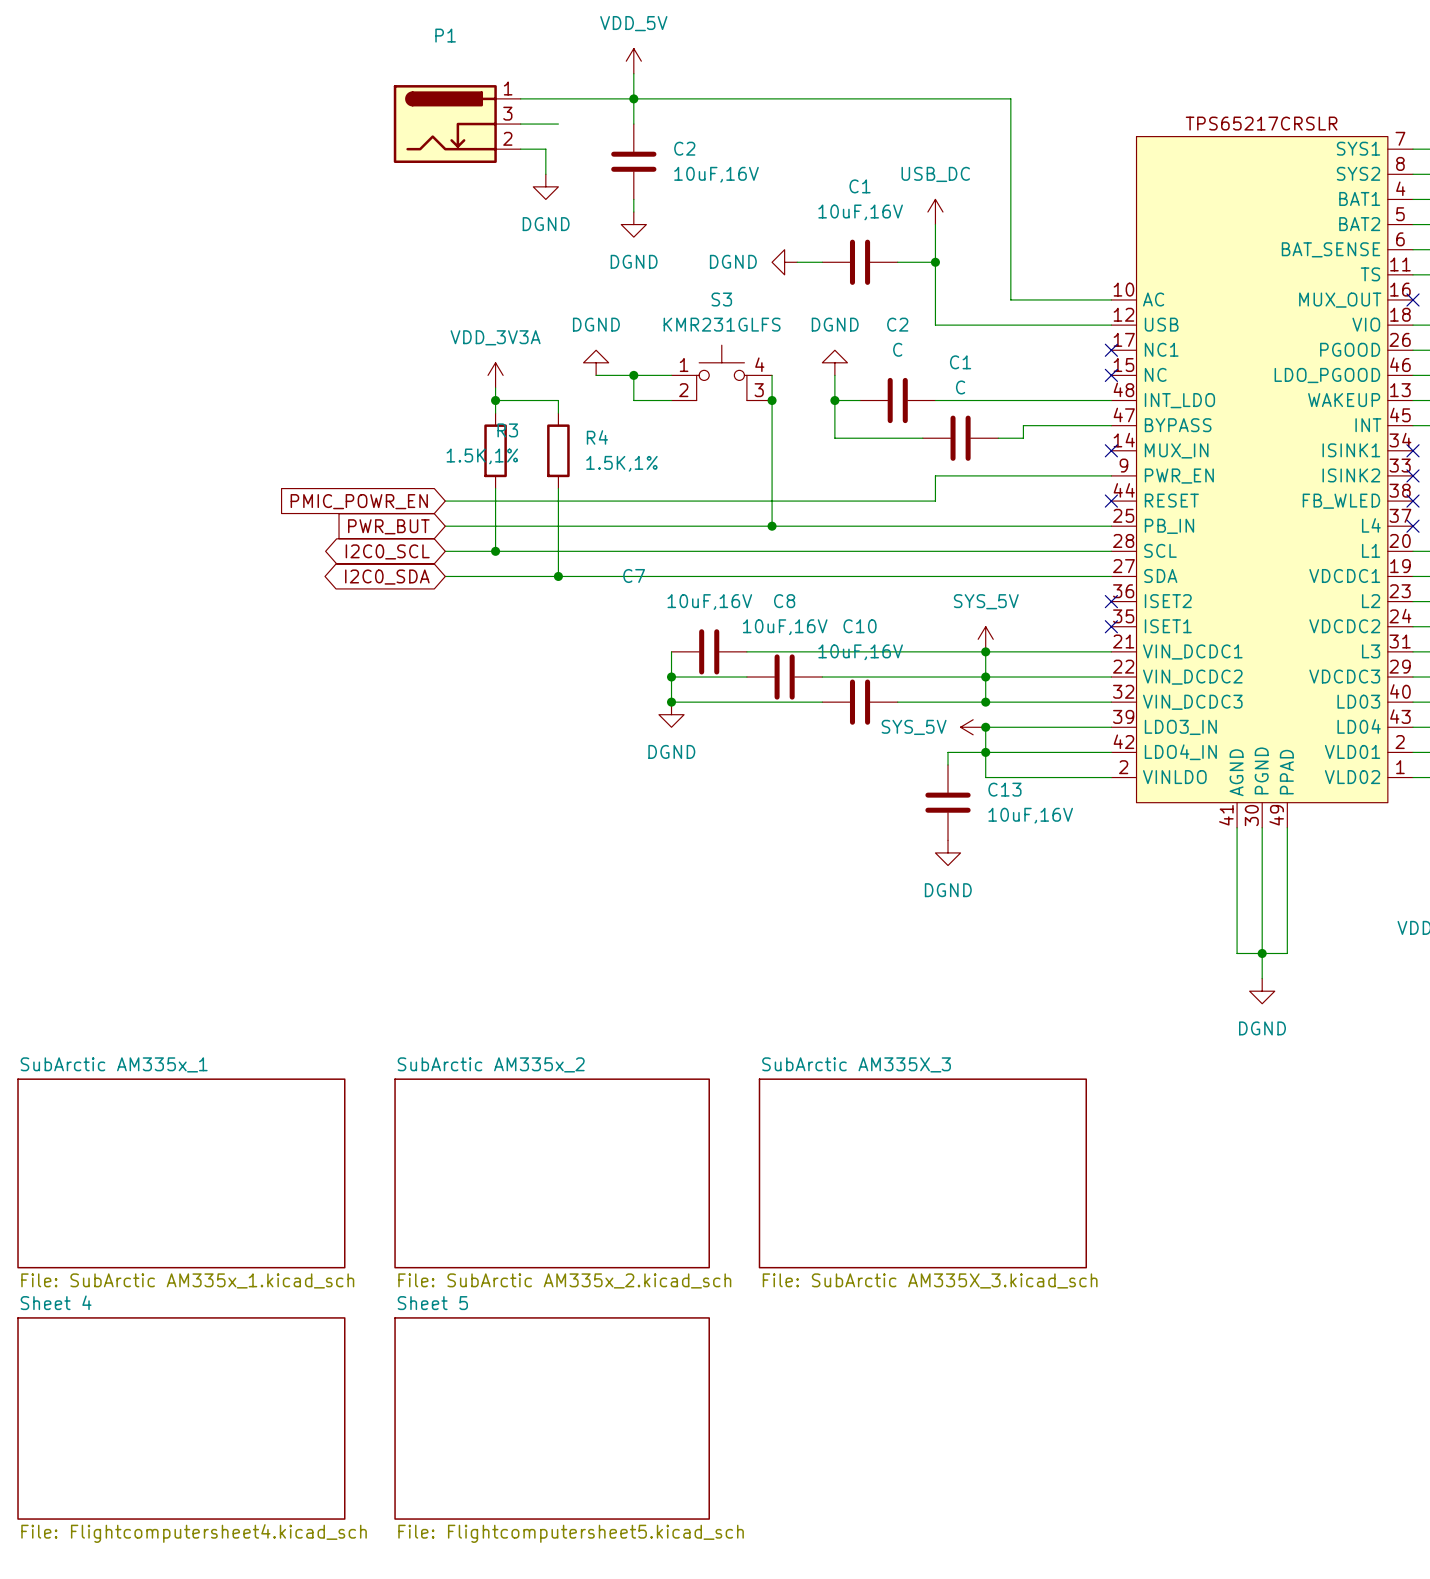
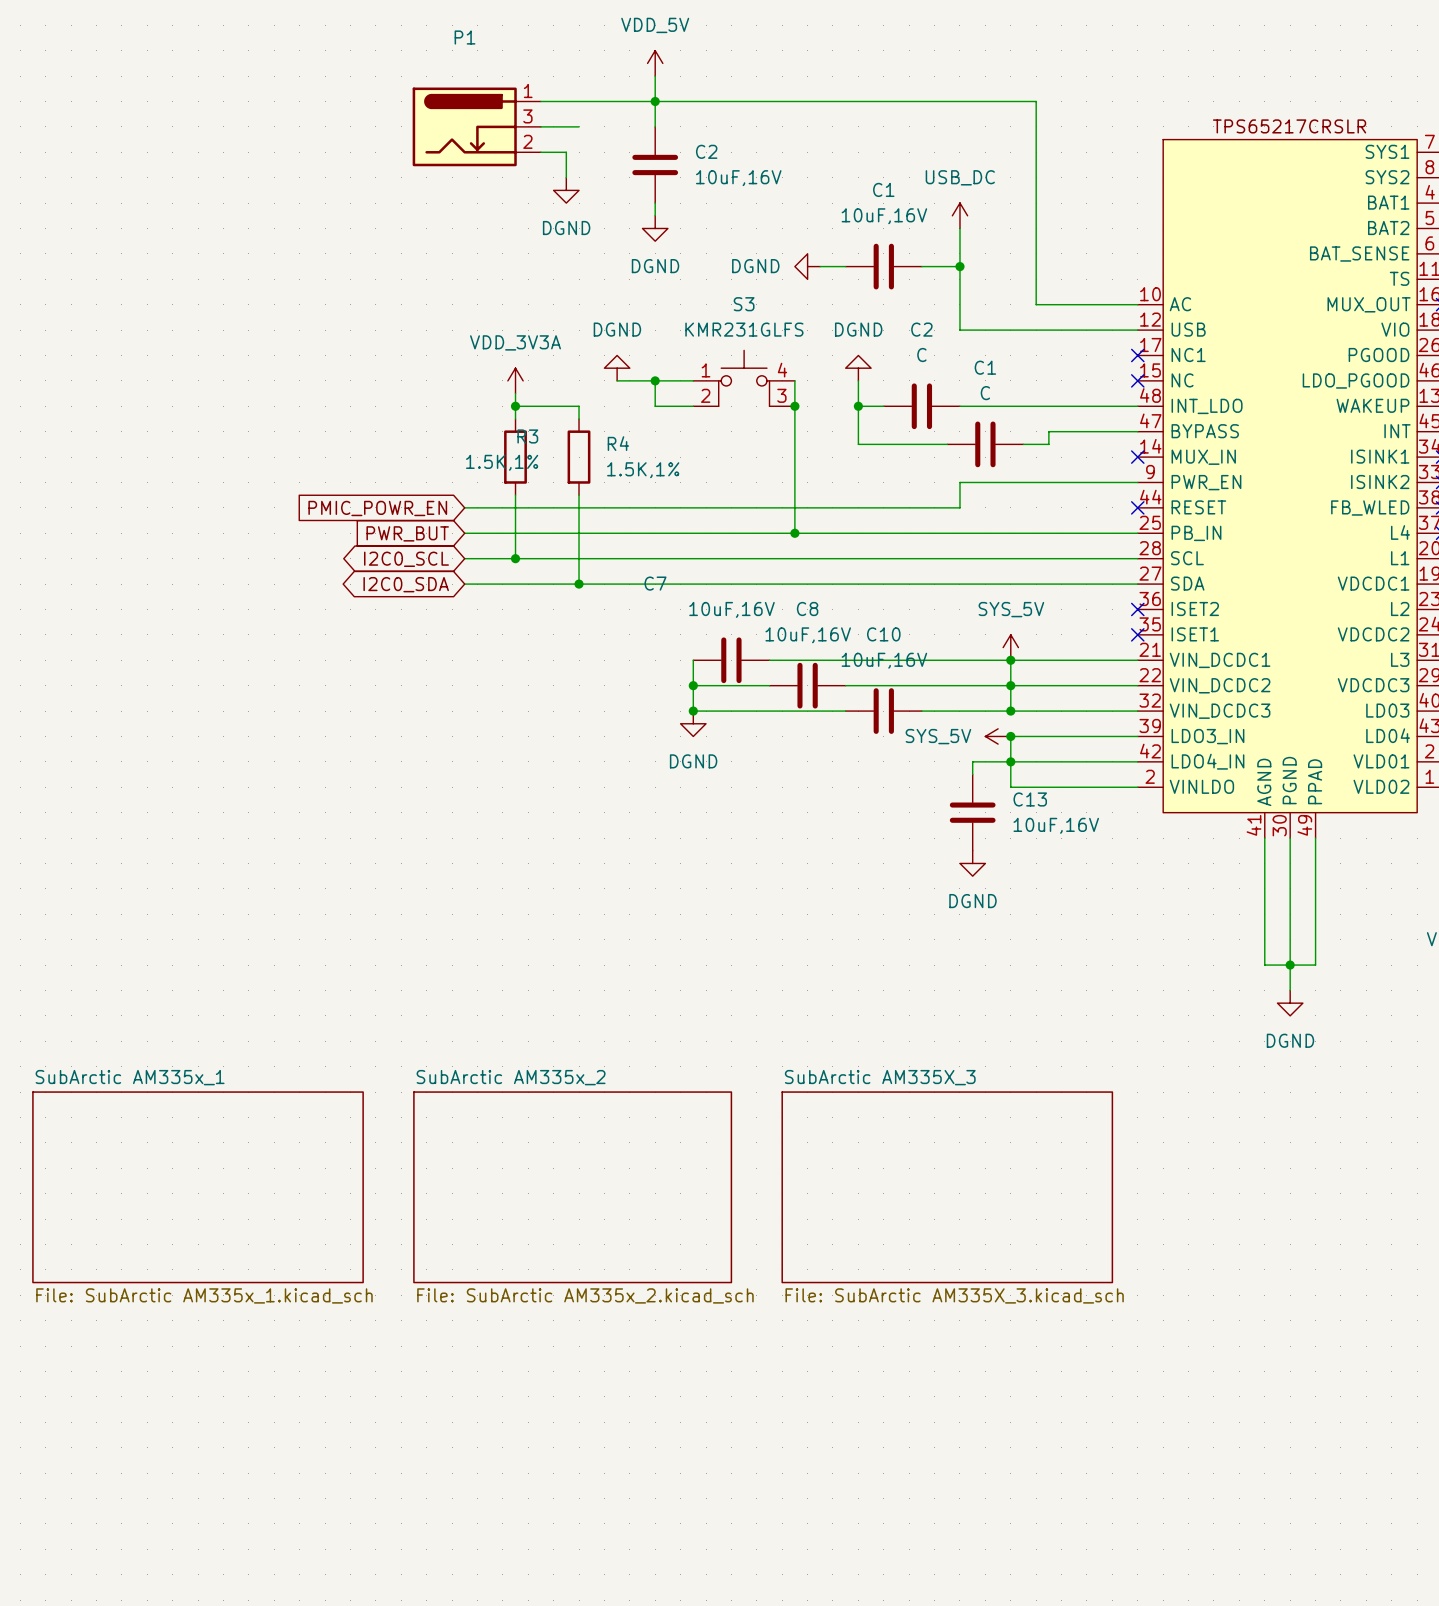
sheet Sheet 4: File: Flightcomputersheet4.kicad_sch (181, 1418) -> none
sheet Sheet 5: File: Flightcomputersheet5.kicad_sch (552, 1418) -> none

